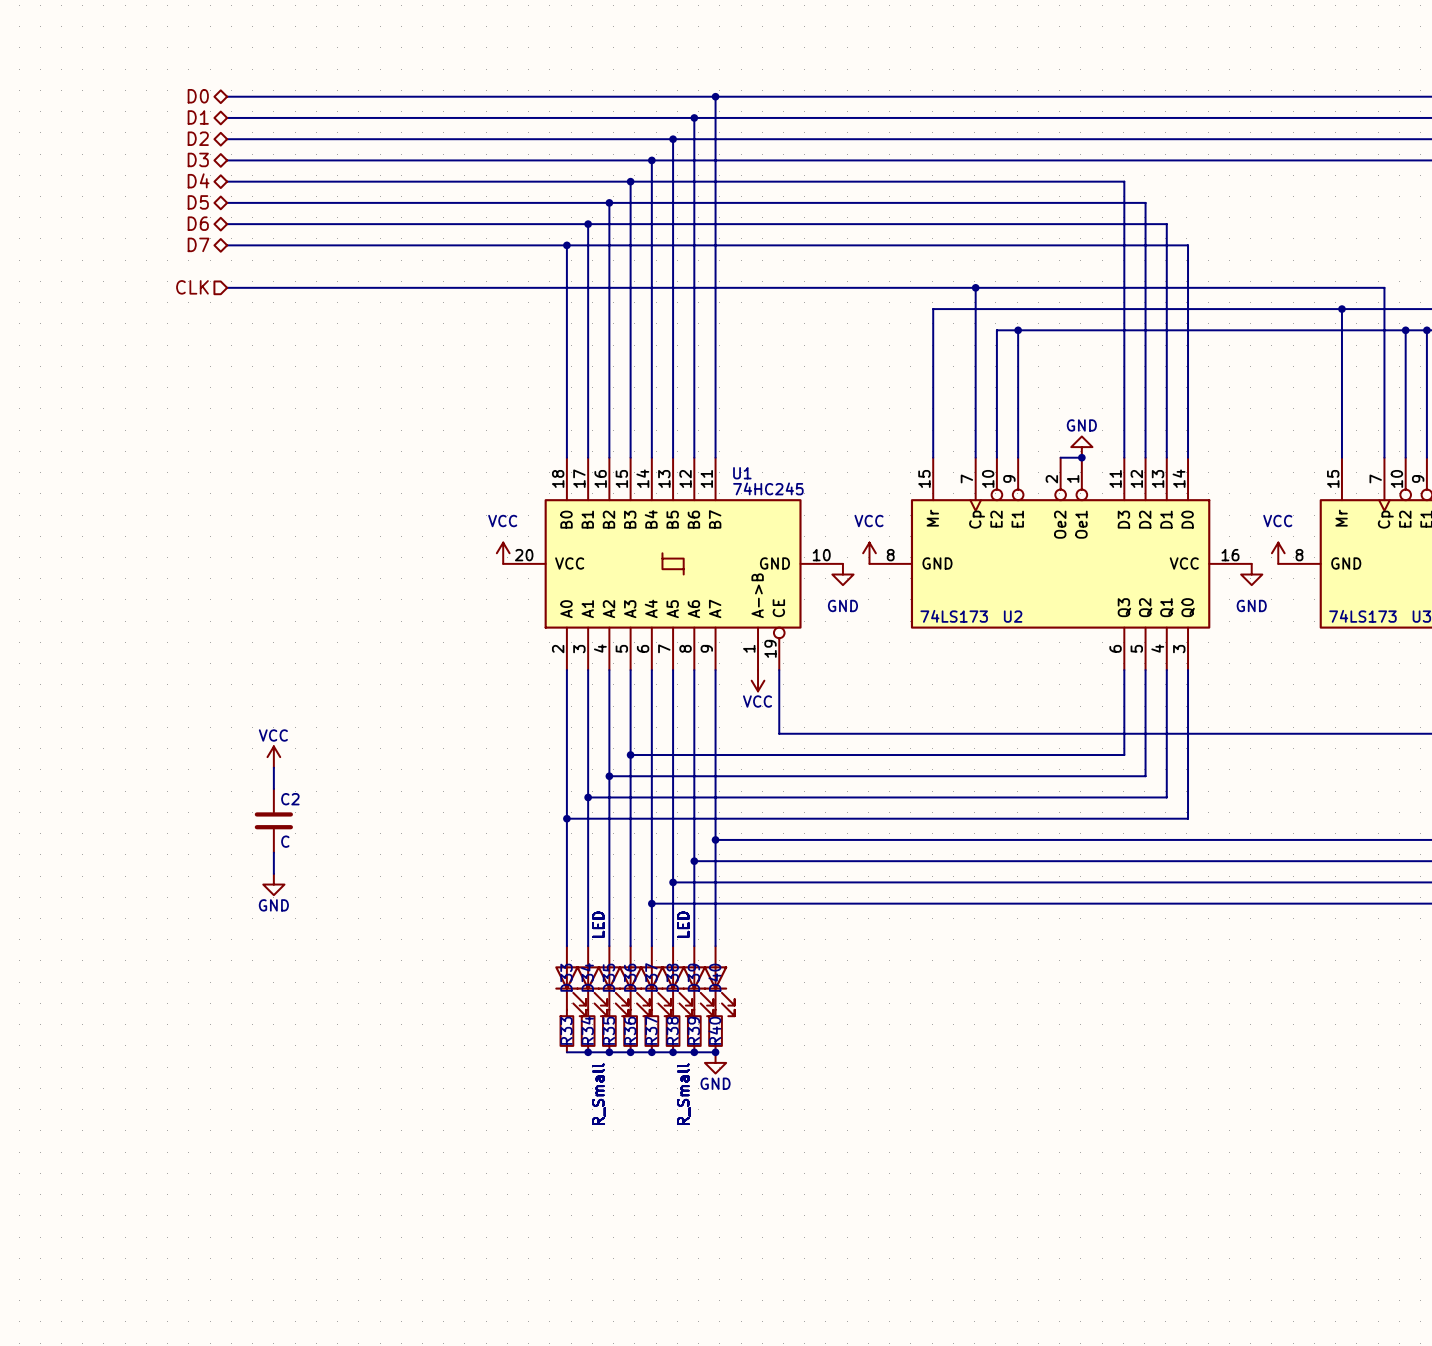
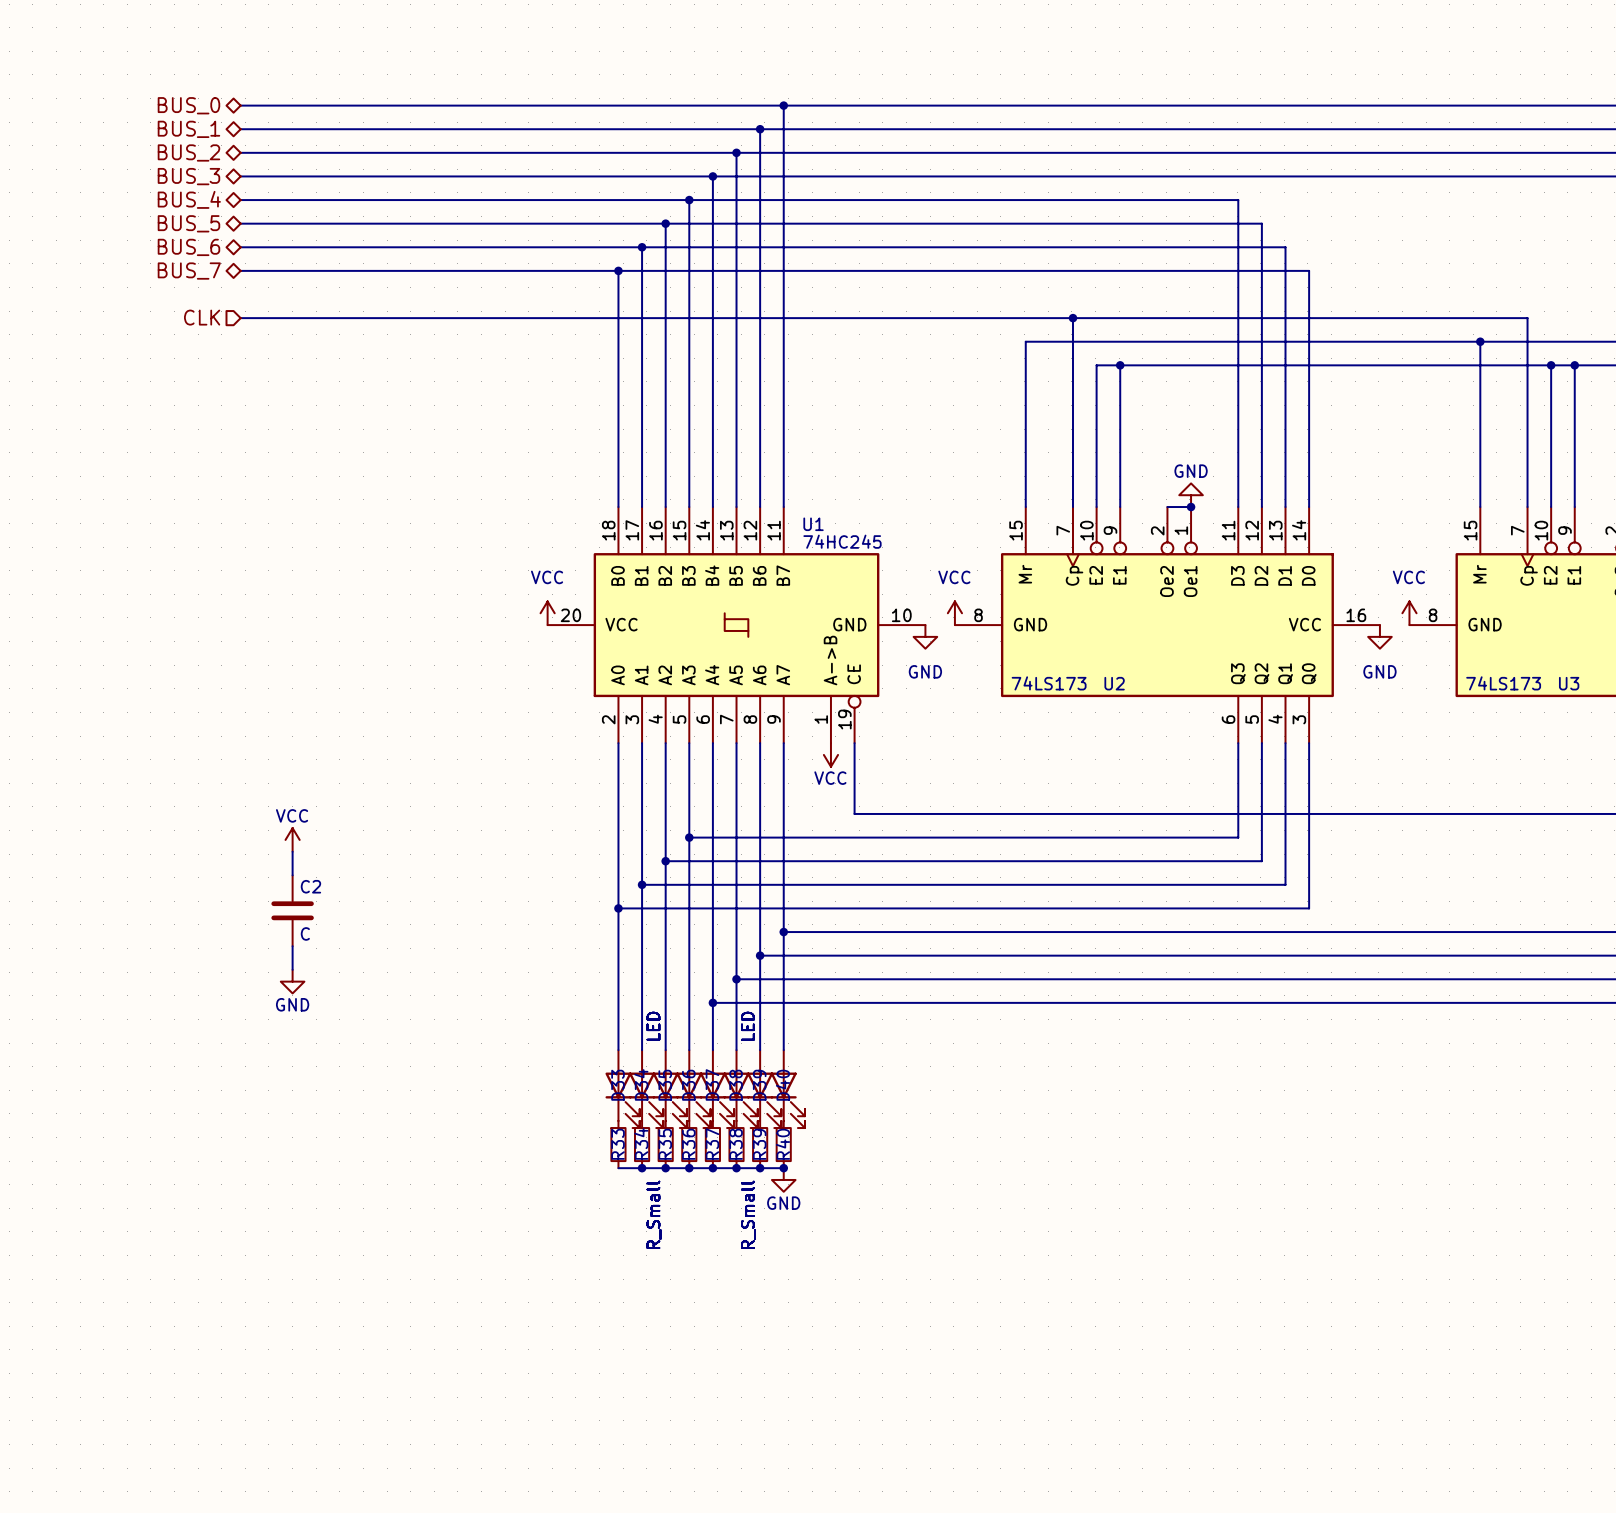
hierarchical label: D0 (198, 96) -> BUS_0 (188, 105)
hierarchical label: D1 (198, 117) -> BUS_1 (188, 129)
hierarchical label: D2 (198, 138) -> BUS_2 (188, 152)
hierarchical label: D3 (198, 159) -> BUS_3 (188, 176)
hierarchical label: D4 (198, 180) -> BUS_4 (189, 199)
hierarchical label: D5 (198, 202) -> BUS_5 (188, 223)
hierarchical label: D6 (198, 223) -> BUS_6 (188, 247)
hierarchical label: D7 (198, 244) -> BUS_7 (189, 271)

